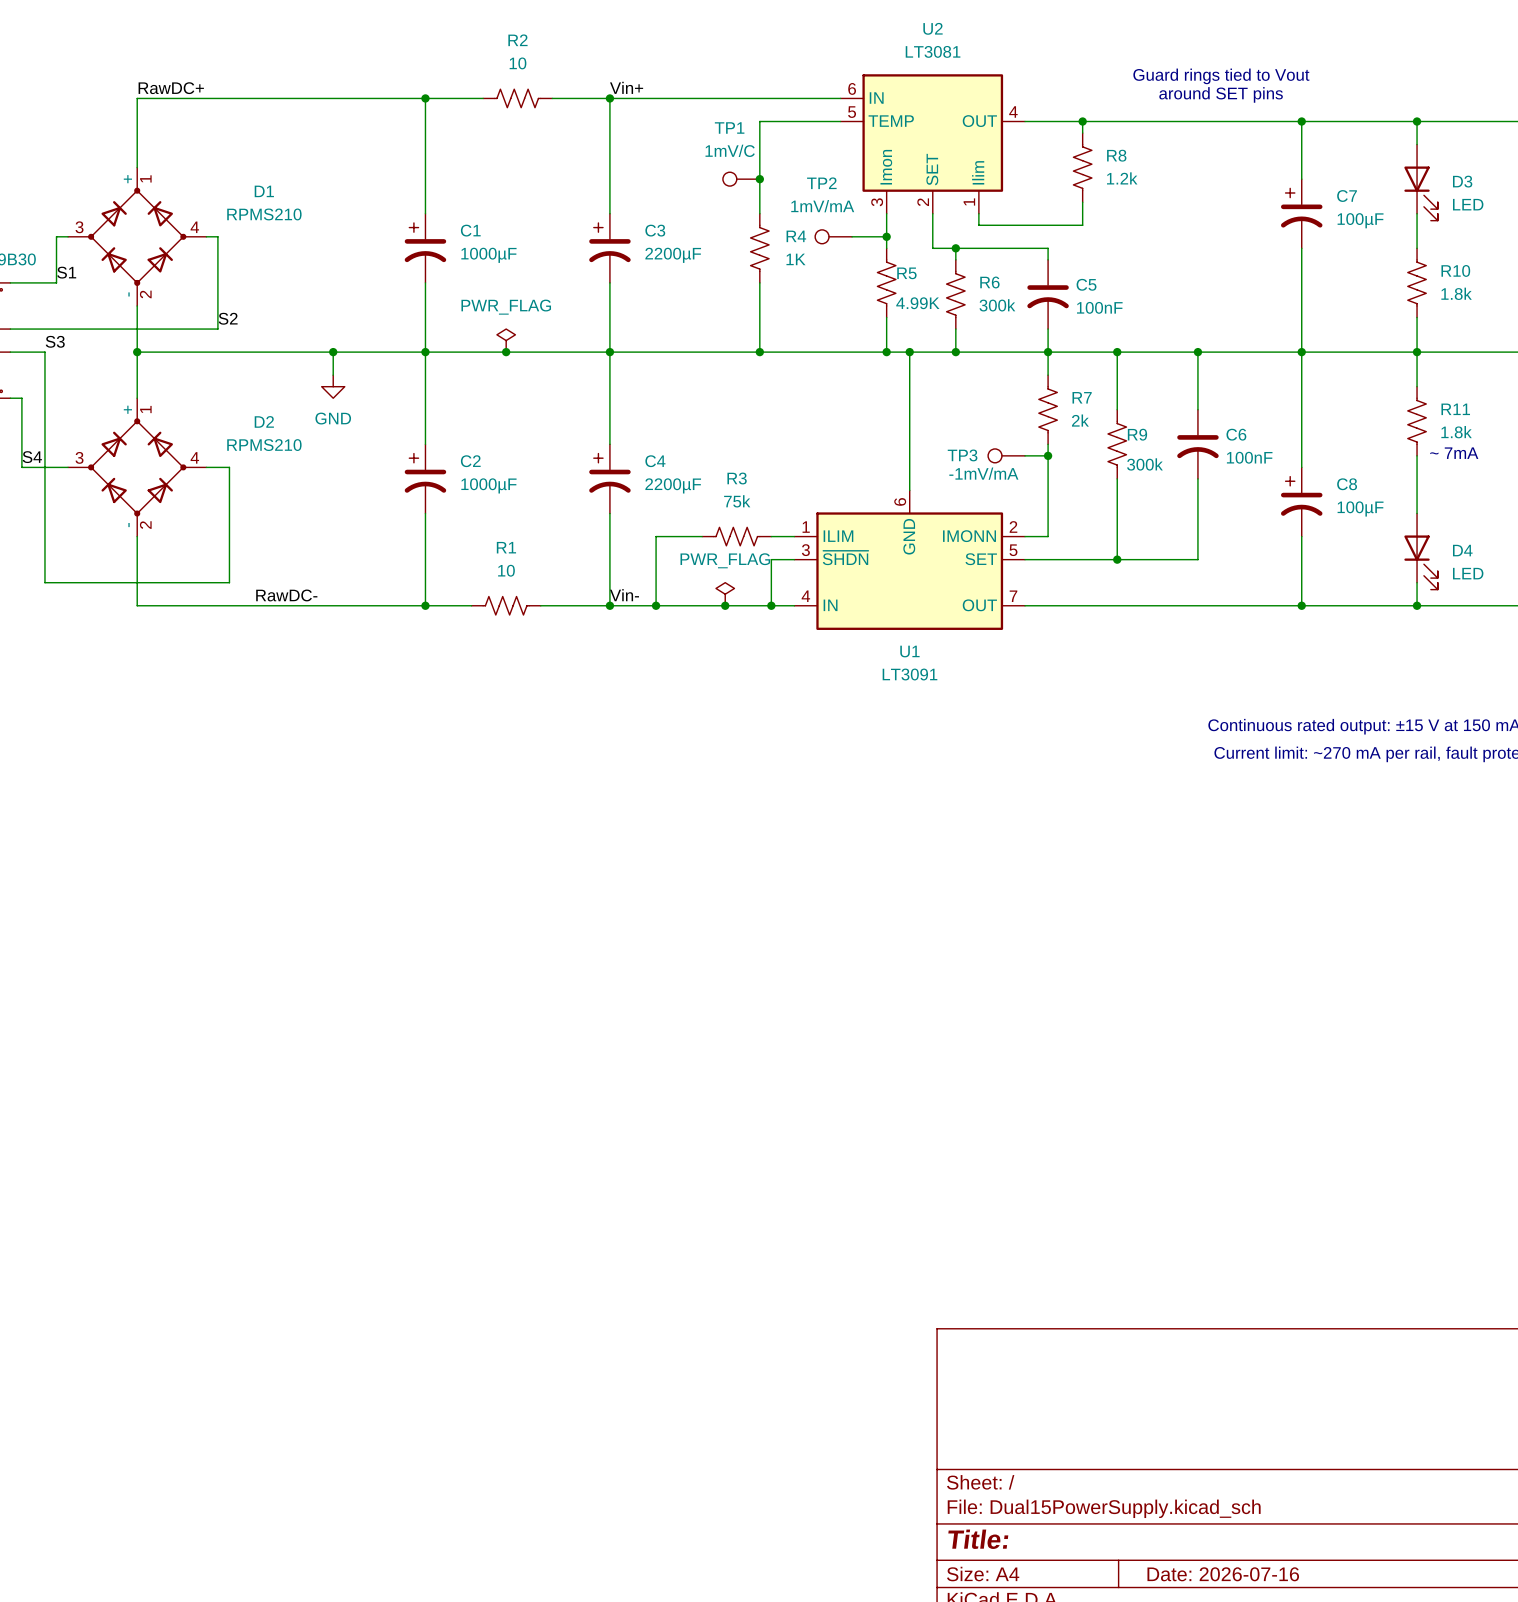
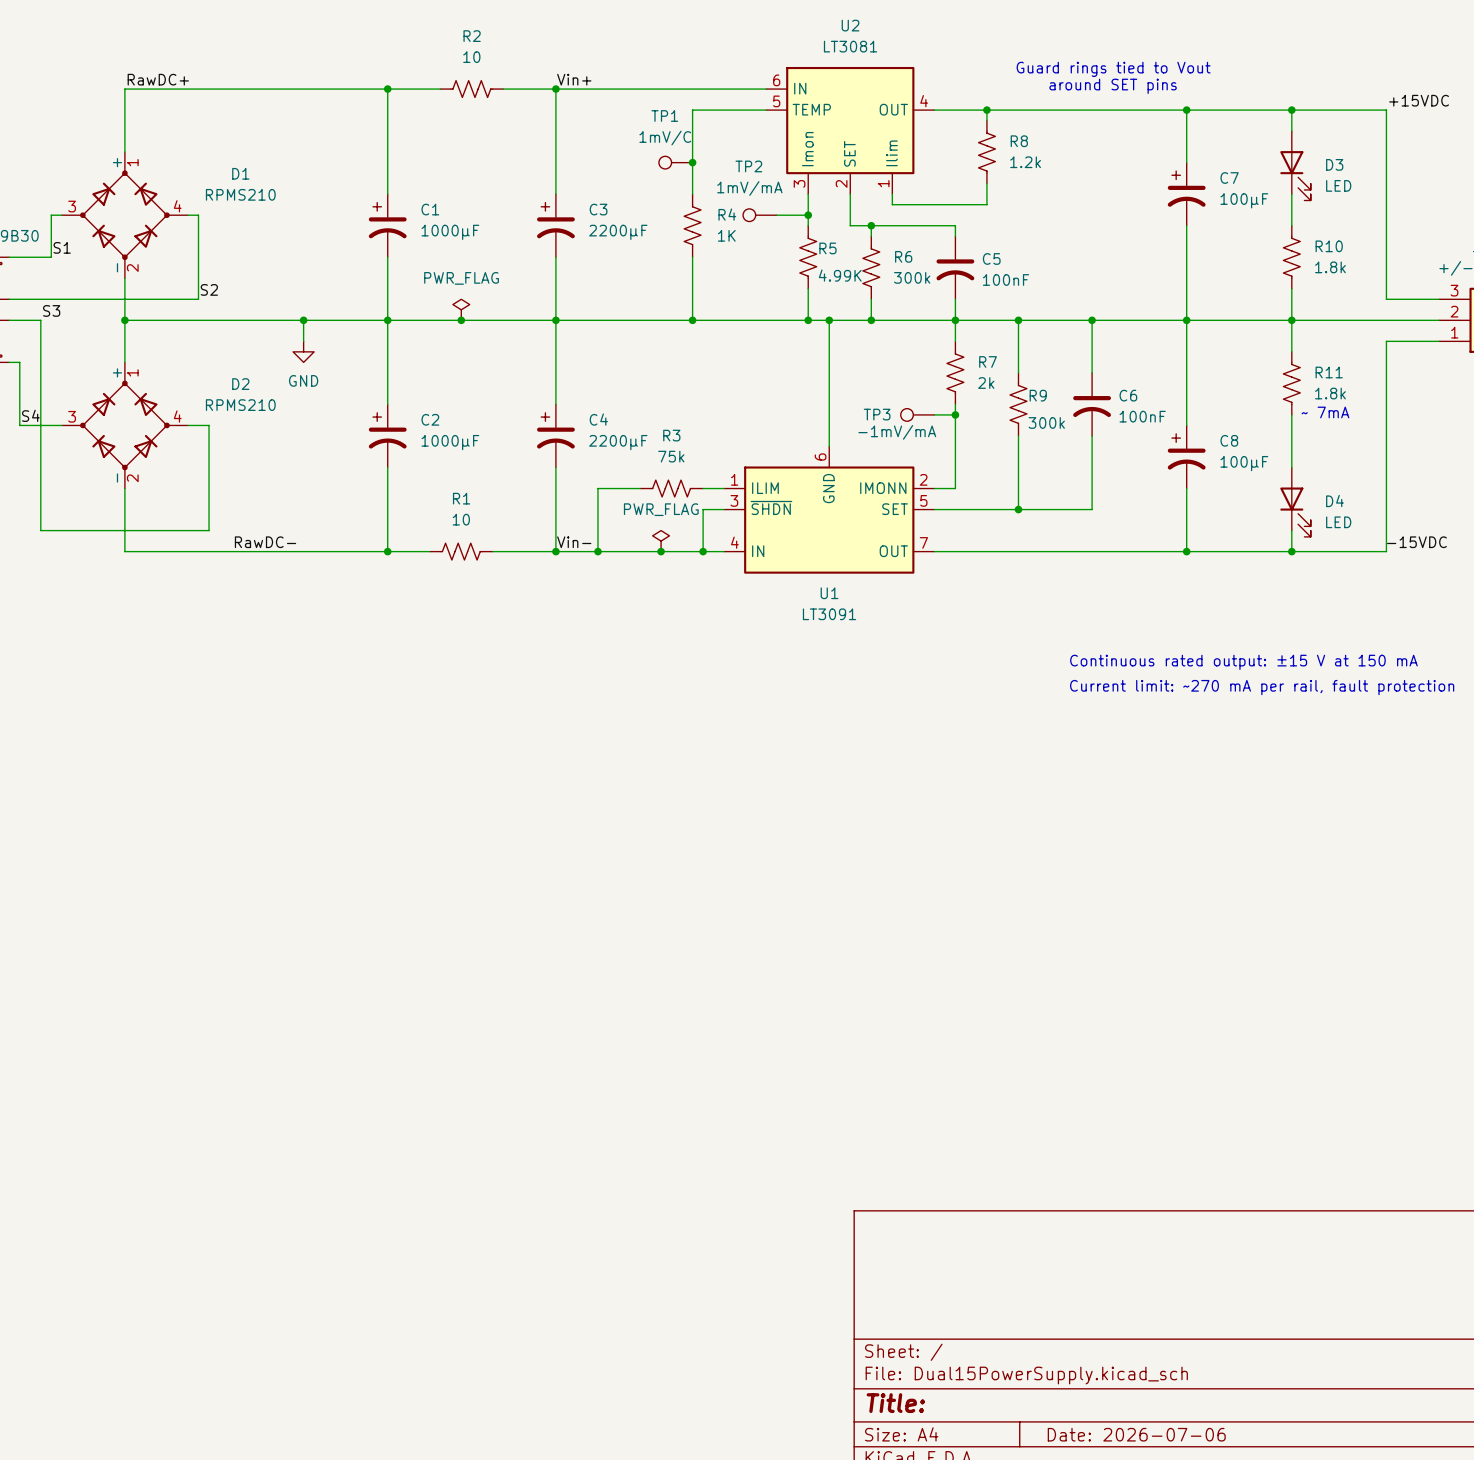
title block: Date: 2026-07-16 (1223, 1574) -> Date: 2026-07-06 (1136, 1434)

